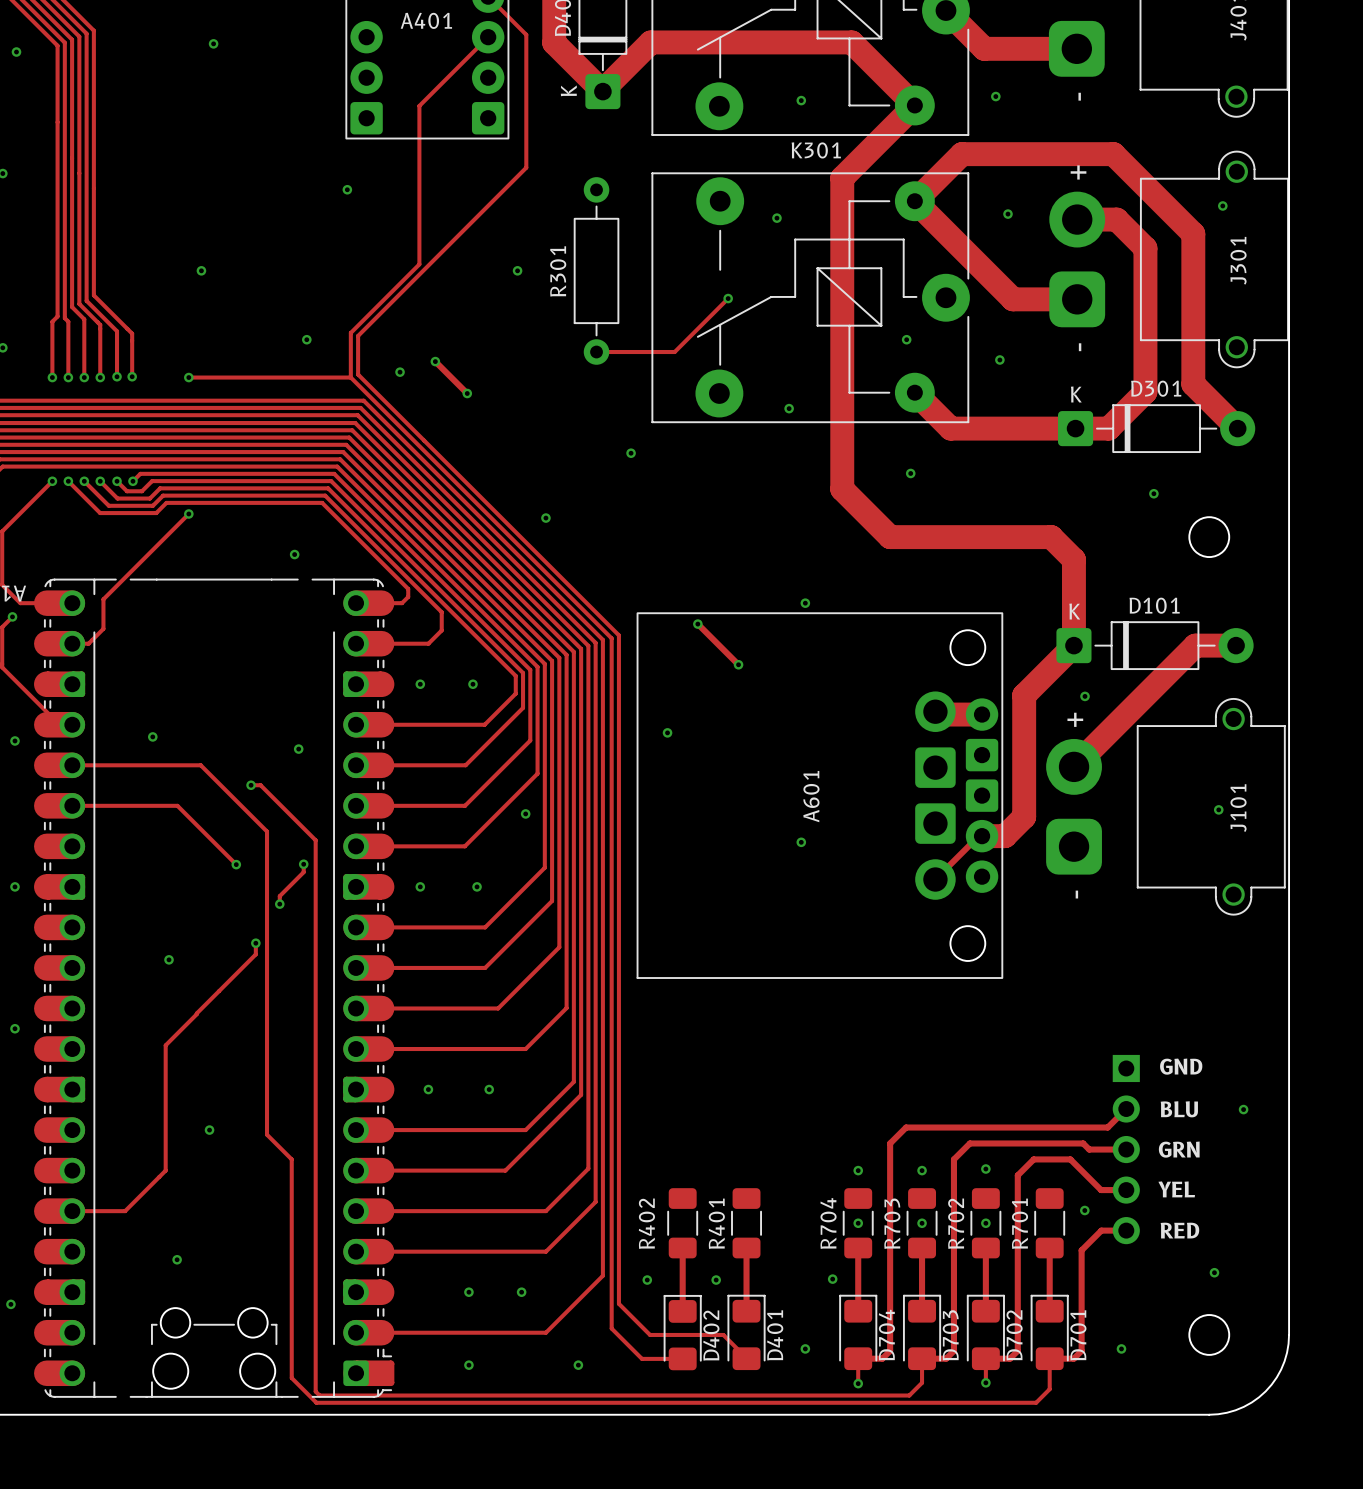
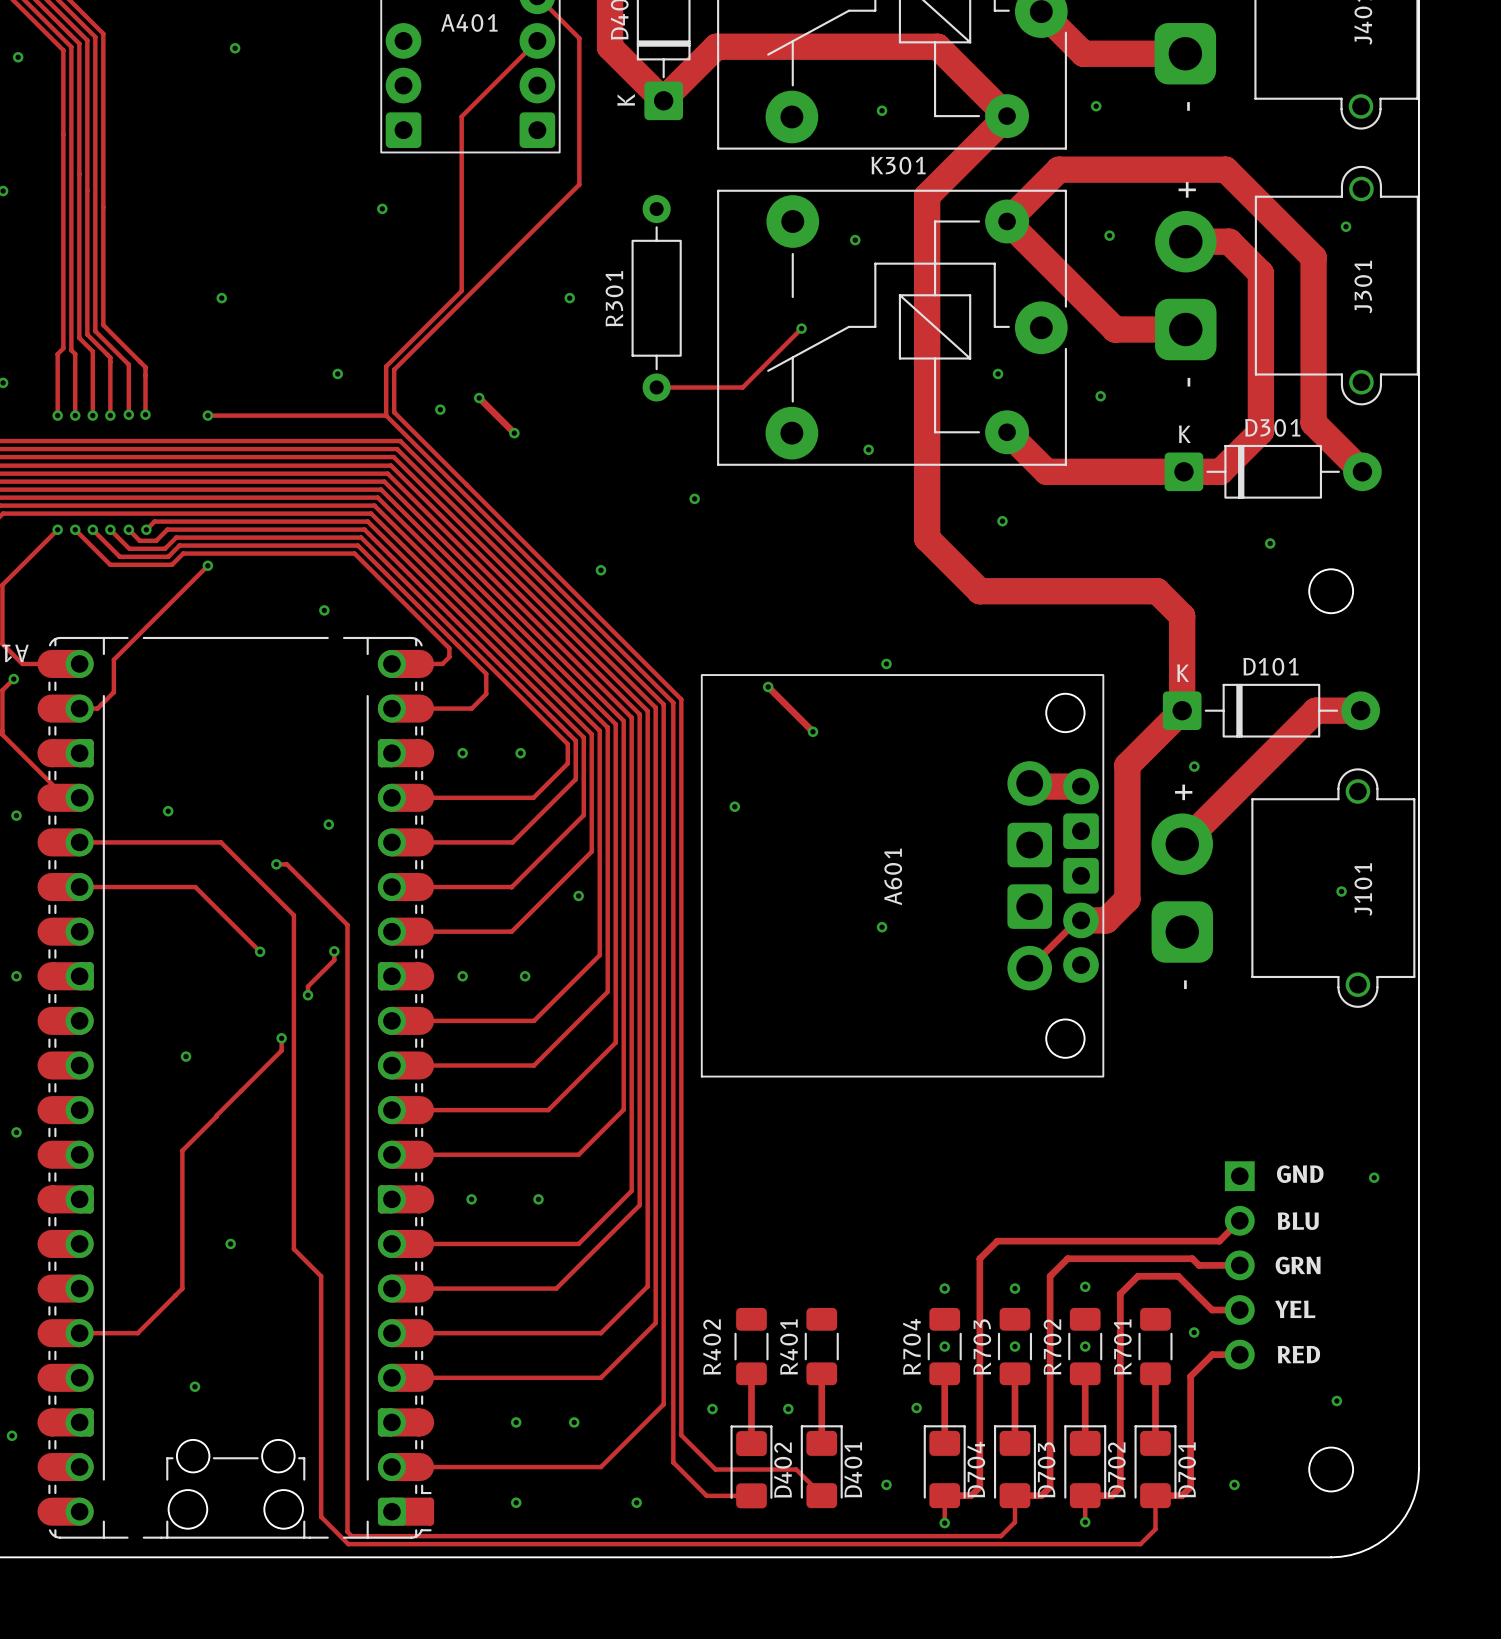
via position: (1243, 1109) -> (1374, 1177)

